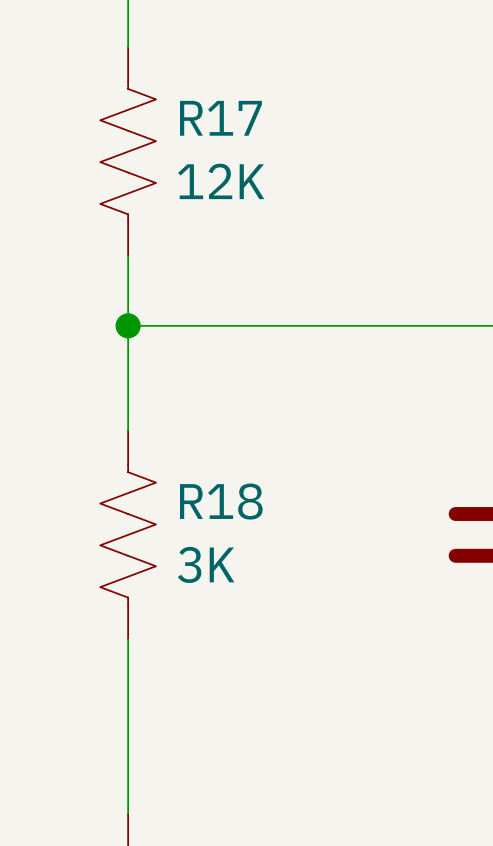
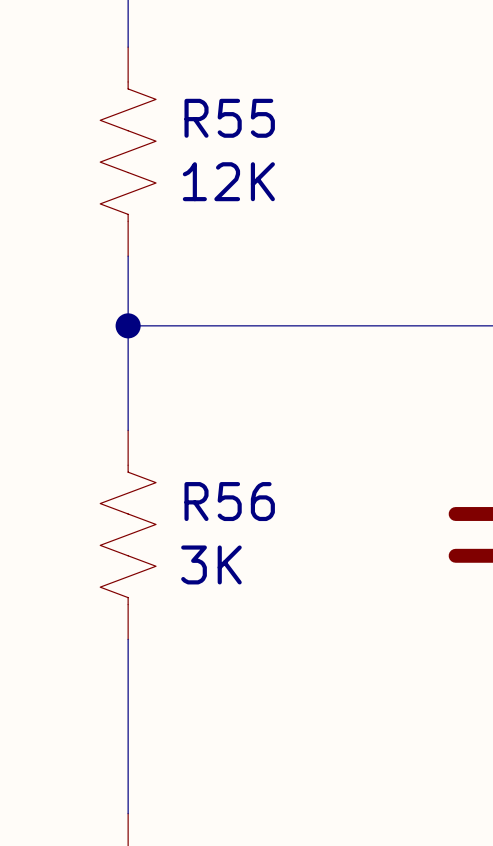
R17 name: R17 (220, 118) -> R55 (229, 118)
R18 name: R18 (221, 501) -> R56 (229, 501)

